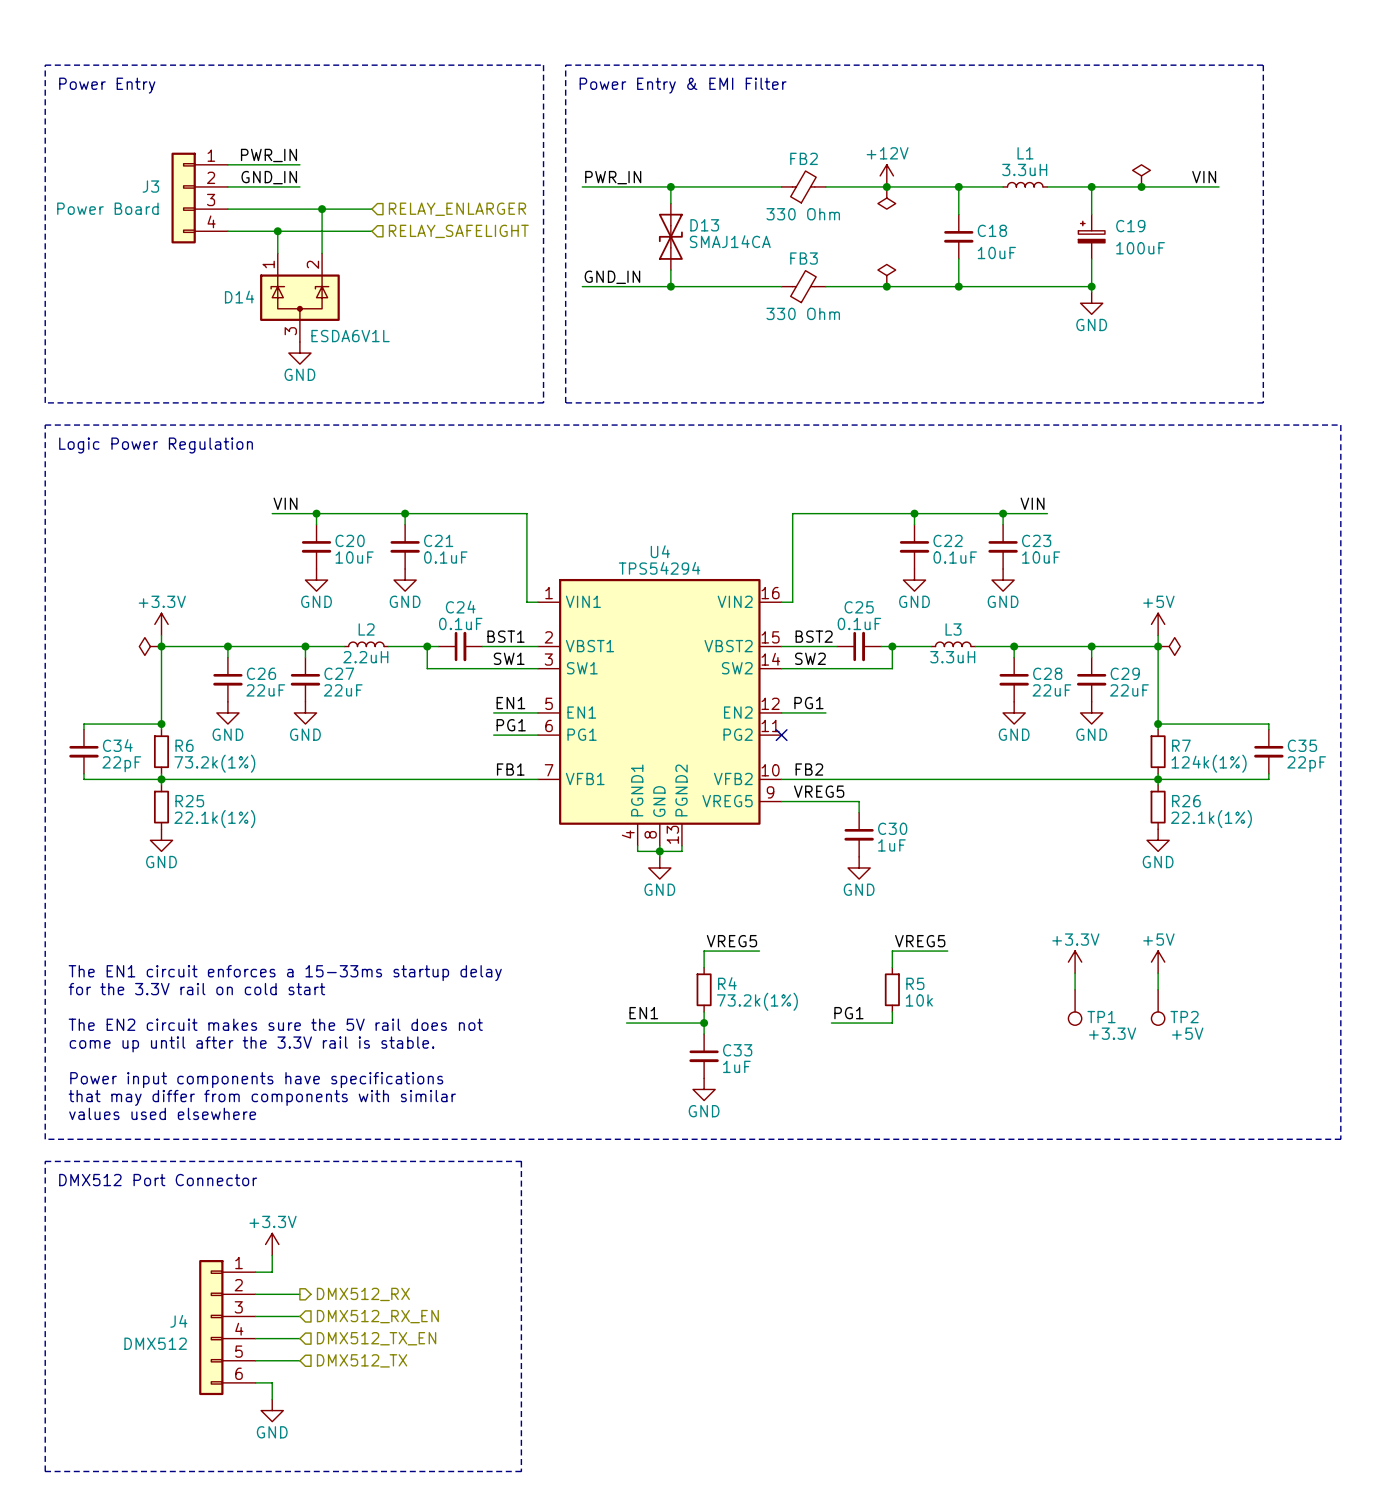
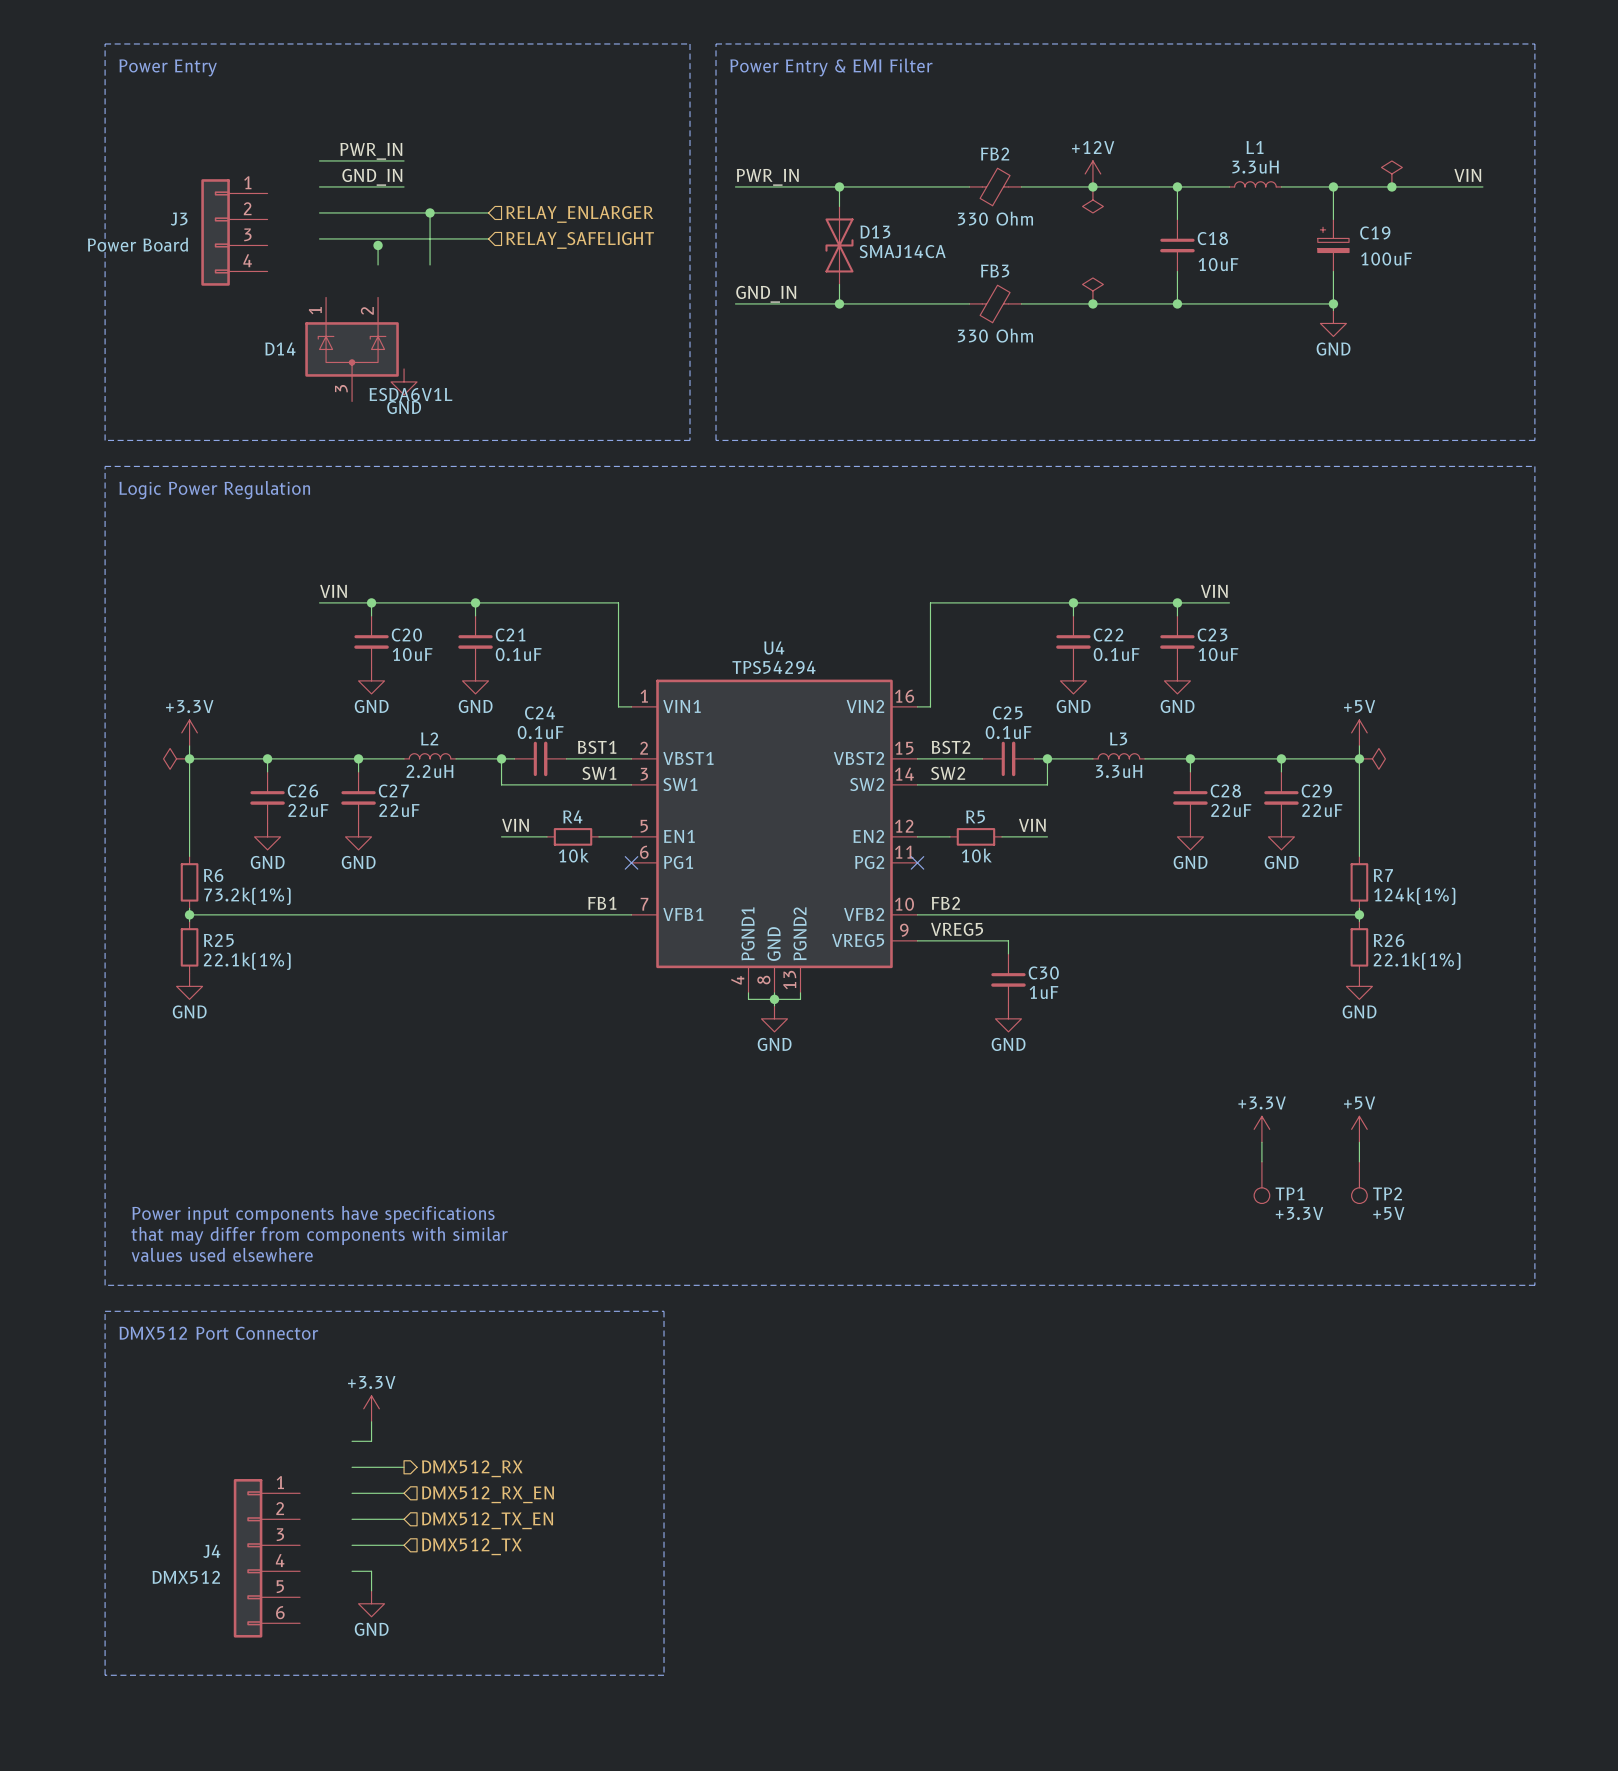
line: (45, 65) (543, 65) (543, 402) (45, 402) (45, 65) -> (105, 43) (690, 43) (690, 440) (105, 440) (105, 43)
line: (565, 65) (1263, 65) (1263, 402) (565, 402) (565, 65) -> (716, 43) (1534, 43) (1534, 440) (716, 440) (716, 43)
text position: Power Entry (107, 85) -> Power Entry (168, 67)
text position: Power Entry & EMI Filter (683, 85) -> Power Entry & EMI Filter (831, 67)
label position: PWR_IN (268, 155) -> PWR_IN (371, 151)
junction: none -> (839, 186)
wire: none -> (1021, 186) (1229, 186)
junction: none -> (1092, 186)
junction: none -> (1177, 186)
junction: none -> (1333, 186)
junction: none -> (1391, 186)
wire: (227, 164) (299, 164) -> (319, 160) (404, 160)
power symbol: none -> (1092, 199)
power symbol position: +12V (886, 175) -> +12V (1092, 173)
power symbol position: (1141, 175) -> (1391, 173)
label position: GND_IN (269, 177) -> GND_IN (372, 177)
label position: PWR_IN (613, 177) -> PWR_IN (767, 177)
label position: VIN (1204, 177) -> VIN (1467, 175)
wire: none -> (430, 212) (430, 264)
junction: none -> (430, 212)
L1 position: (1025, 184) -> (1255, 184)
wire: (227, 186) (299, 186) -> (319, 186) (404, 186)
wire: (582, 186) (781, 186) -> (735, 186) (969, 186)
wire: (670, 186) (670, 203) -> (839, 186) (839, 206)
junction: (670, 186) -> none
FB2 position: (803, 186) -> (995, 186)
wire: (825, 186) (1003, 186) -> (1177, 186) (1177, 219)
junction: (886, 186) -> none
wire: (958, 186) (958, 214) -> none
junction: (958, 186) -> none
wire: (1047, 186) (1219, 186) -> (1281, 186) (1482, 186)
wire: (1091, 186) (1091, 214) -> (1333, 186) (1333, 219)
junction: (1091, 186) -> none
junction: (1141, 186) -> none
power symbol: (886, 198) -> none
wire: (227, 209) (371, 209) -> (319, 212) (488, 212)
hierarchical label position: RELAY_ENLARGER (457, 209) -> RELAY_ENLARGER (579, 214)
wire: (322, 225) (322, 253) -> none
wire: (227, 231) (371, 231) -> (319, 238) (488, 238)
wire: (277, 231) (277, 253) -> none
junction: (277, 231) -> none
hierarchical label position: RELAY_SAFELIGHT (458, 231) -> RELAY_SAFELIGHT (580, 240)
D13 position: (670, 236) -> (839, 245)
C18 position: (958, 236) -> (1177, 245)
C19 position: (1091, 236) -> (1333, 245)
power symbol: none -> (1092, 290)
junction: none -> (839, 303)
junction: none -> (1092, 303)
wire: (958, 258) (958, 286) -> (1177, 271) (1177, 303)
junction: none -> (1177, 303)
wire: (1091, 258) (1091, 292) -> (1333, 271) (1333, 310)
junction: none -> (1333, 303)
wire: (670, 270) (670, 286) -> (839, 284) (839, 303)
power symbol: (886, 275) -> none
label position: GND_IN (612, 277) -> GND_IN (766, 294)
wire: (582, 286) (781, 286) -> (735, 303) (969, 303)
junction: (670, 286) -> none
FB3 position: (803, 286) -> (995, 303)
wire: (825, 286) (1091, 286) -> (1021, 303) (1333, 303)
junction: (886, 286) -> none
junction: (958, 286) -> none
junction: (1091, 286) -> none
power symbol position: GND (1091, 303) -> GND (1333, 323)
power symbol position: GND (299, 353) -> GND (404, 381)
line: (45, 425) (45, 1139) (1340, 1139) (1340, 425) (45, 425) -> (105, 466) (105, 1285) (1534, 1285) (1534, 466) (105, 466)
text position: Logic Power Regulation (156, 445) -> Logic Power Regulation (214, 490)
label: none -> VIN (515, 825)
label: EN1 (510, 703) -> none
label: PG1 (808, 703) -> none
label: none -> VIN (1032, 825)
wire: none -> (501, 836) (547, 836)
wire: (493, 712) (510, 712) -> none
wire: (809, 712) (825, 712) -> none
wire: none -> (1001, 836) (1047, 836)
wire: (161, 724) (83, 724) (83, 729) -> none
junction: (161, 724) -> none
wire: (1158, 724) (1268, 724) (1268, 729) -> none
junction: (1158, 724) -> none
label: PG1 (511, 725) -> none
wire: (493, 735) (538, 735) -> none
no-connect mark: none -> (631, 862)
C34: 22pF (83, 751) -> none
C35: 22pF (1268, 751) -> none
wire: (83, 773) (83, 779) (161, 779) -> none
wire: (1268, 773) (1268, 779) (1158, 779) -> none
label: VREG5 (731, 941) -> none
label: VREG5 (920, 941) -> none
wire: (759, 951) (704, 951) (704, 967) -> none
wire: (947, 951) (892, 951) (892, 967) -> none
text: The EN1 circuit enforces a 15-33ms startup delay (285, 973) -> none
R4 name position: R4 (727, 983) -> R4 (572, 816)
R5 name position: R5 (915, 983) -> R5 (975, 816)
text: for the 3.3V rail on cold start (196, 989) -> none
R4 rotation: 0° (704, 989) -> 90° clockwise (573, 836)
R4 position: (704, 989) -> (573, 836)
R5 rotation: 0° (892, 989) -> 90° clockwise (975, 836)
R5 position: (892, 989) -> (975, 836)
R4 value: 73.2k(1%) (757, 1001) -> 10k (573, 855)
wire: (704, 1011) (704, 1034) -> none
wire: (892, 1011) (892, 1023) (831, 1023) -> none
label: EN1 (643, 1013) -> none
label: PG1 (848, 1013) -> none
wire: (626, 1023) (704, 1023) -> none
junction: (704, 1023) -> none
text: The EN2 circuit makes sure the 5V rail does not (275, 1024) -> none
text: come up until after the 3.3V rail is stable. (252, 1044) -> none
C33: 1uF (704, 1056) -> none
text position: Power input components have specifications (256, 1080) -> Power input components have specifications (313, 1215)
power symbol: GND (704, 1089) -> none
text position: that may differ from components with similar (262, 1097) -> that may differ from components with similar (319, 1235)
text position: values used elsewhere (162, 1113) -> values used elsewhere (222, 1254)
line: (45, 1161) (45, 1471) (521, 1471) (521, 1161) (45, 1161) -> (105, 1311) (105, 1675) (664, 1675) (664, 1311) (105, 1311)
text position: DMX512 Port Connector (158, 1180) -> DMX512 Port Connector (218, 1333)
power symbol position: +3.3V (272, 1244) -> +3.3V (371, 1408)
wire: none -> (352, 1467) (404, 1467)
wire: (272, 1255) (272, 1272) (255, 1272) -> (371, 1421) (371, 1441) (352, 1441)
wire: (255, 1294) (299, 1294) -> (404, 1519) (352, 1519)
hierarchical label position: DMX512_RX (363, 1294) -> DMX512_RX (472, 1468)
wire: (255, 1316) (299, 1316) -> (404, 1545) (352, 1545)
hierarchical label position: DMX512_RX_EN (377, 1316) -> DMX512_RX_EN (487, 1494)
wire: (255, 1338) (299, 1338) -> (371, 1590) (371, 1571) (352, 1571)
hierarchical label position: DMX512_TX_EN (376, 1338) -> DMX512_TX_EN (487, 1520)
wire: (255, 1360) (299, 1360) -> (352, 1493) (404, 1493)
hierarchical label position: DMX512_TX (362, 1360) -> DMX512_TX (471, 1546)
wire: (255, 1382) (272, 1382) (272, 1399) -> none
power symbol position: GND (272, 1410) -> GND (371, 1603)

